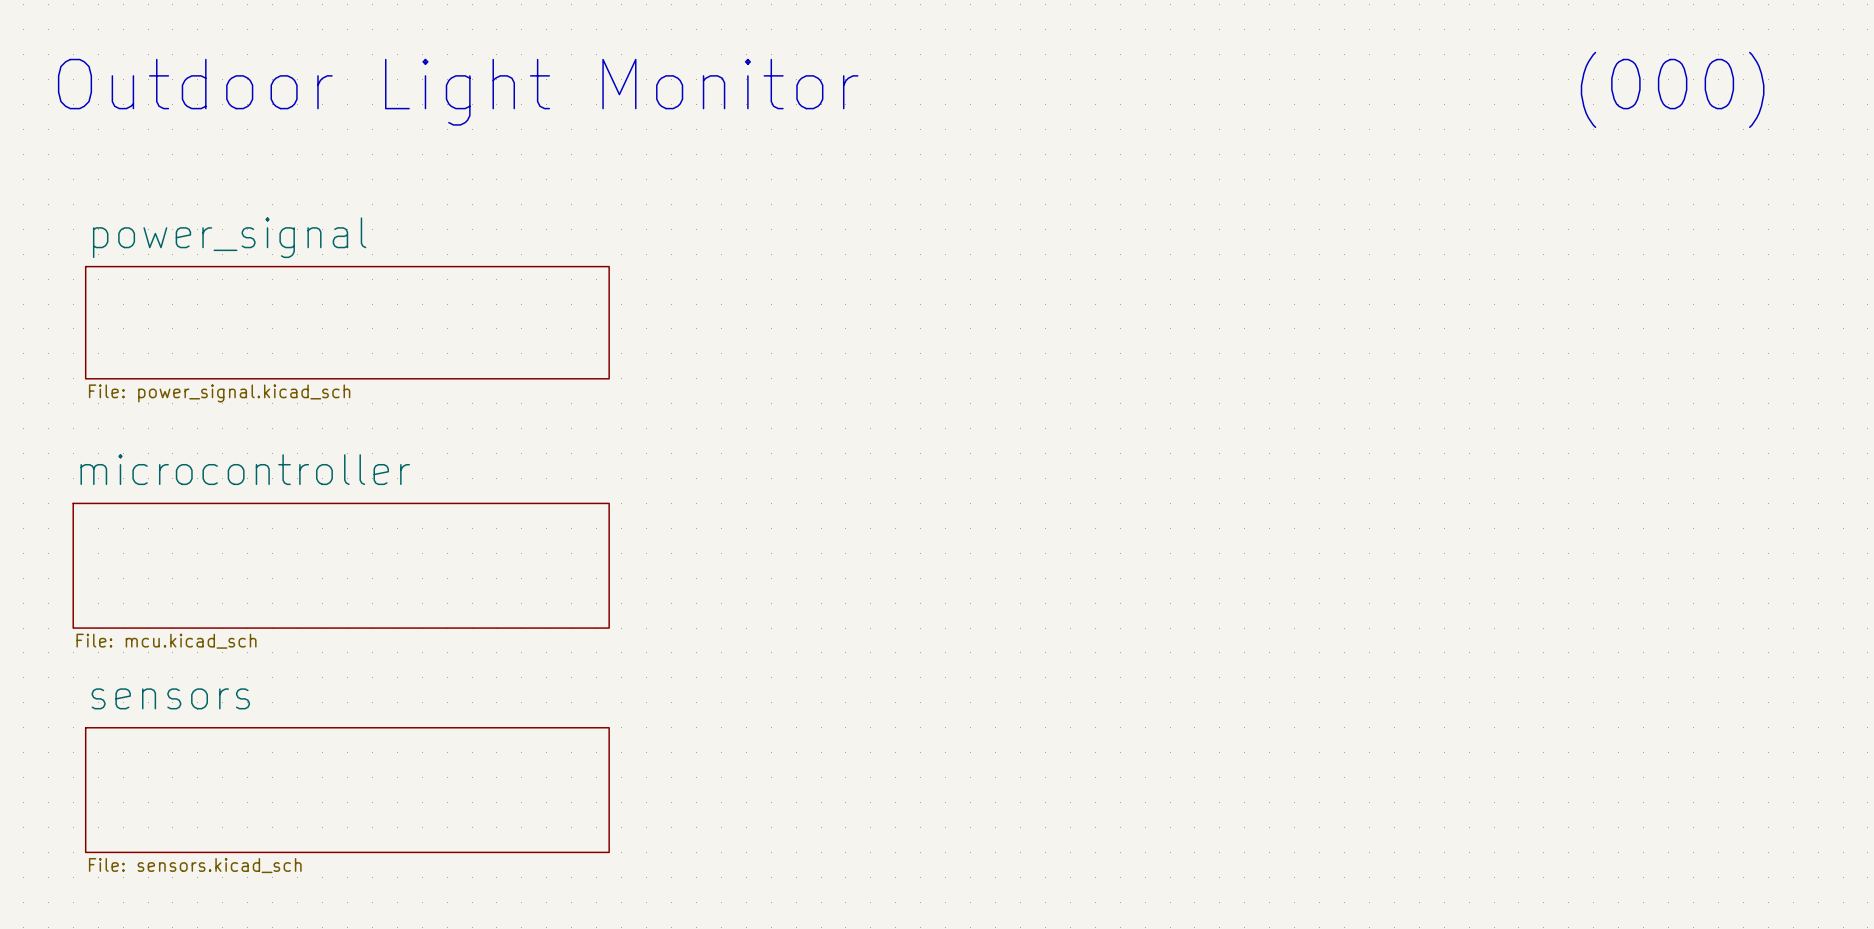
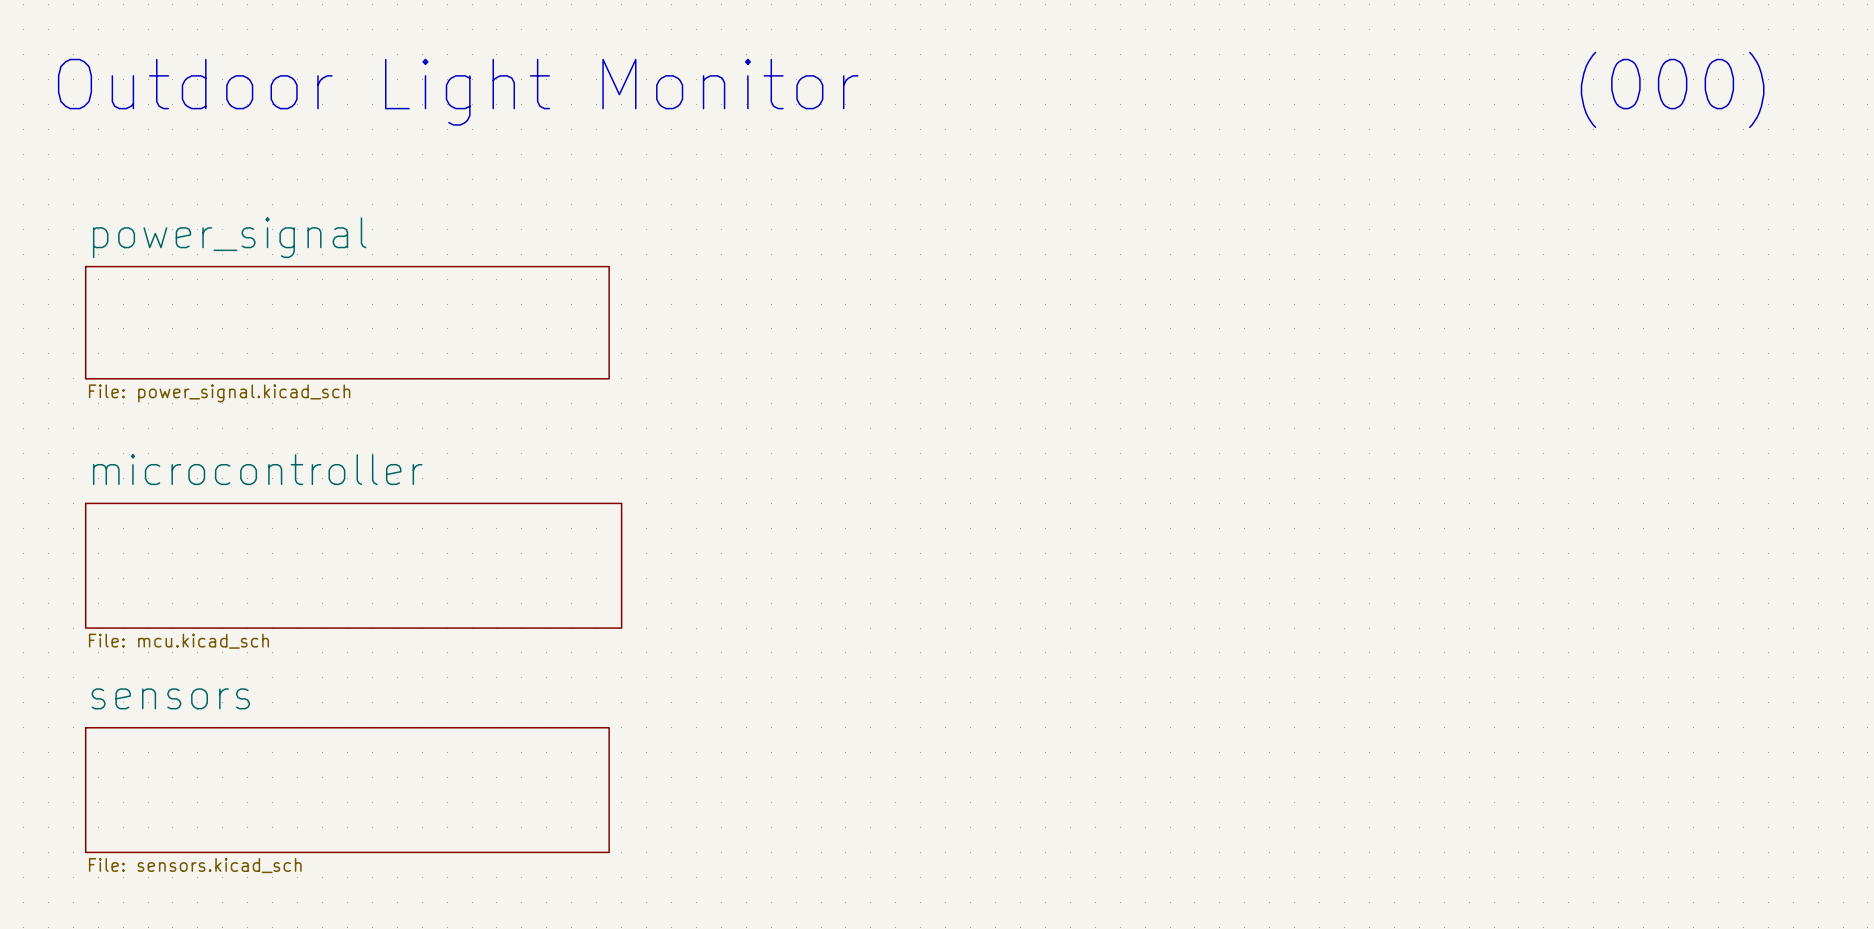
sheet microcontroller position: (341, 565) -> (353, 565)

